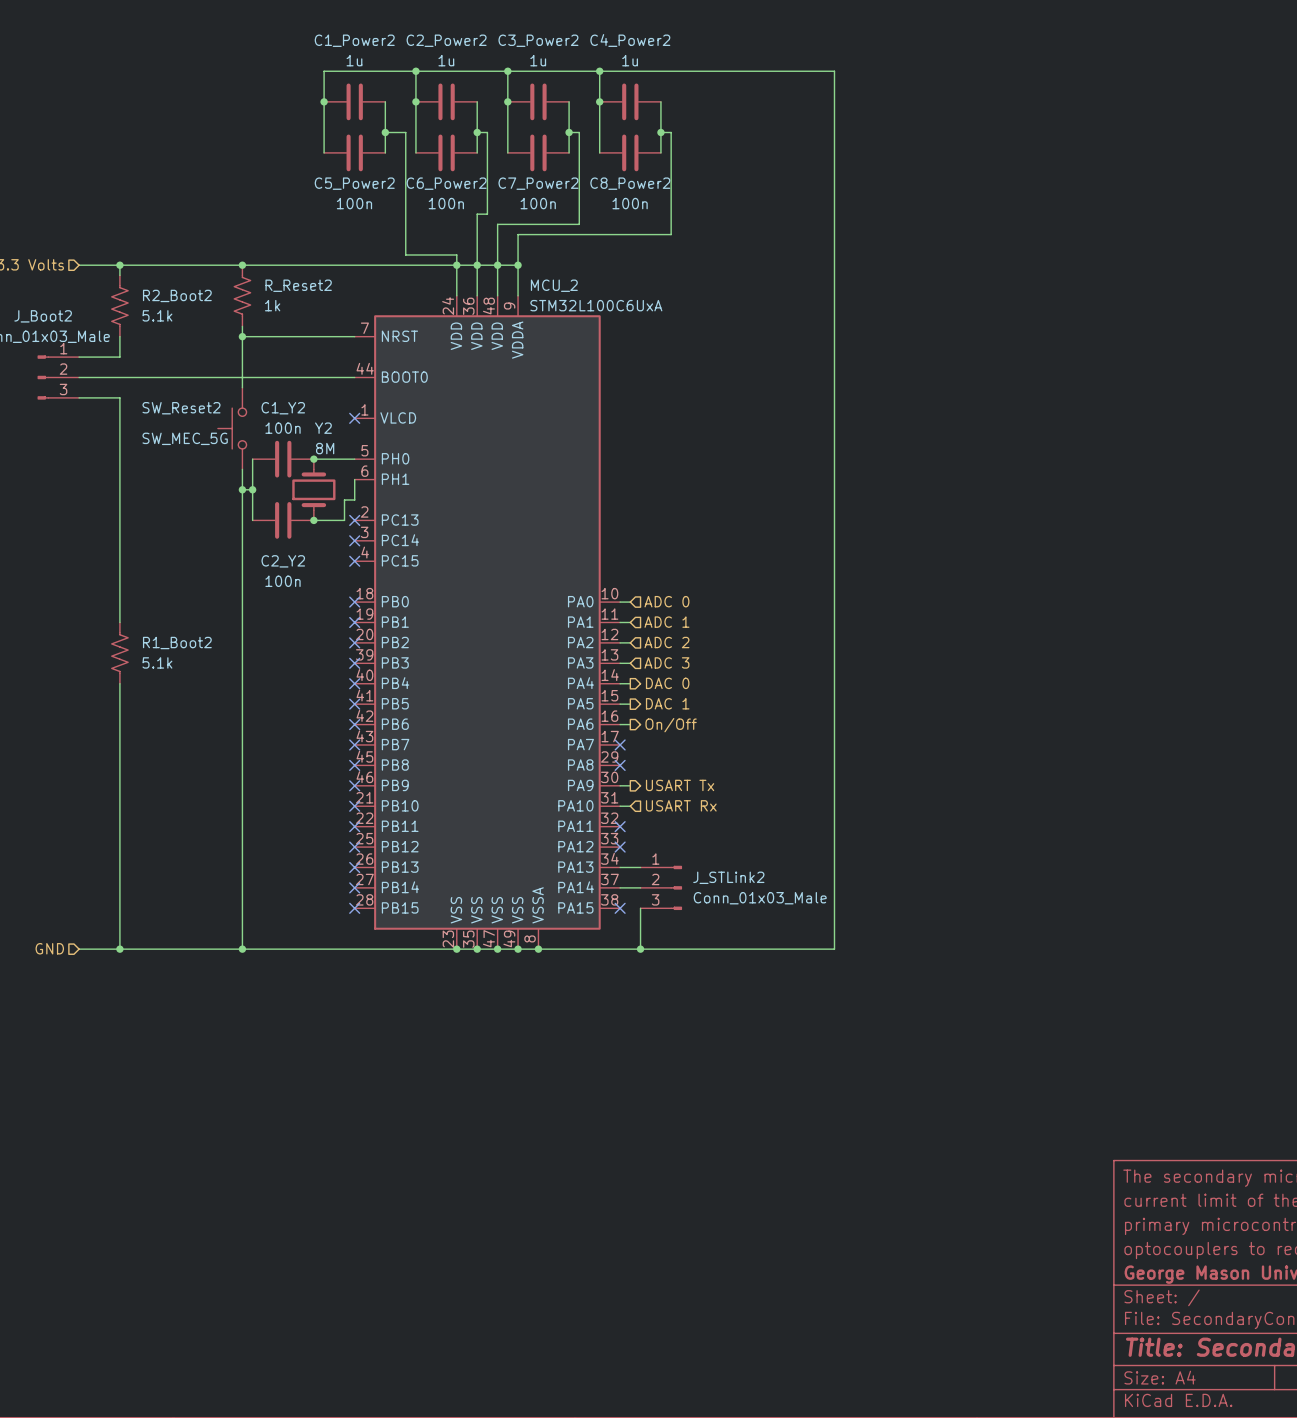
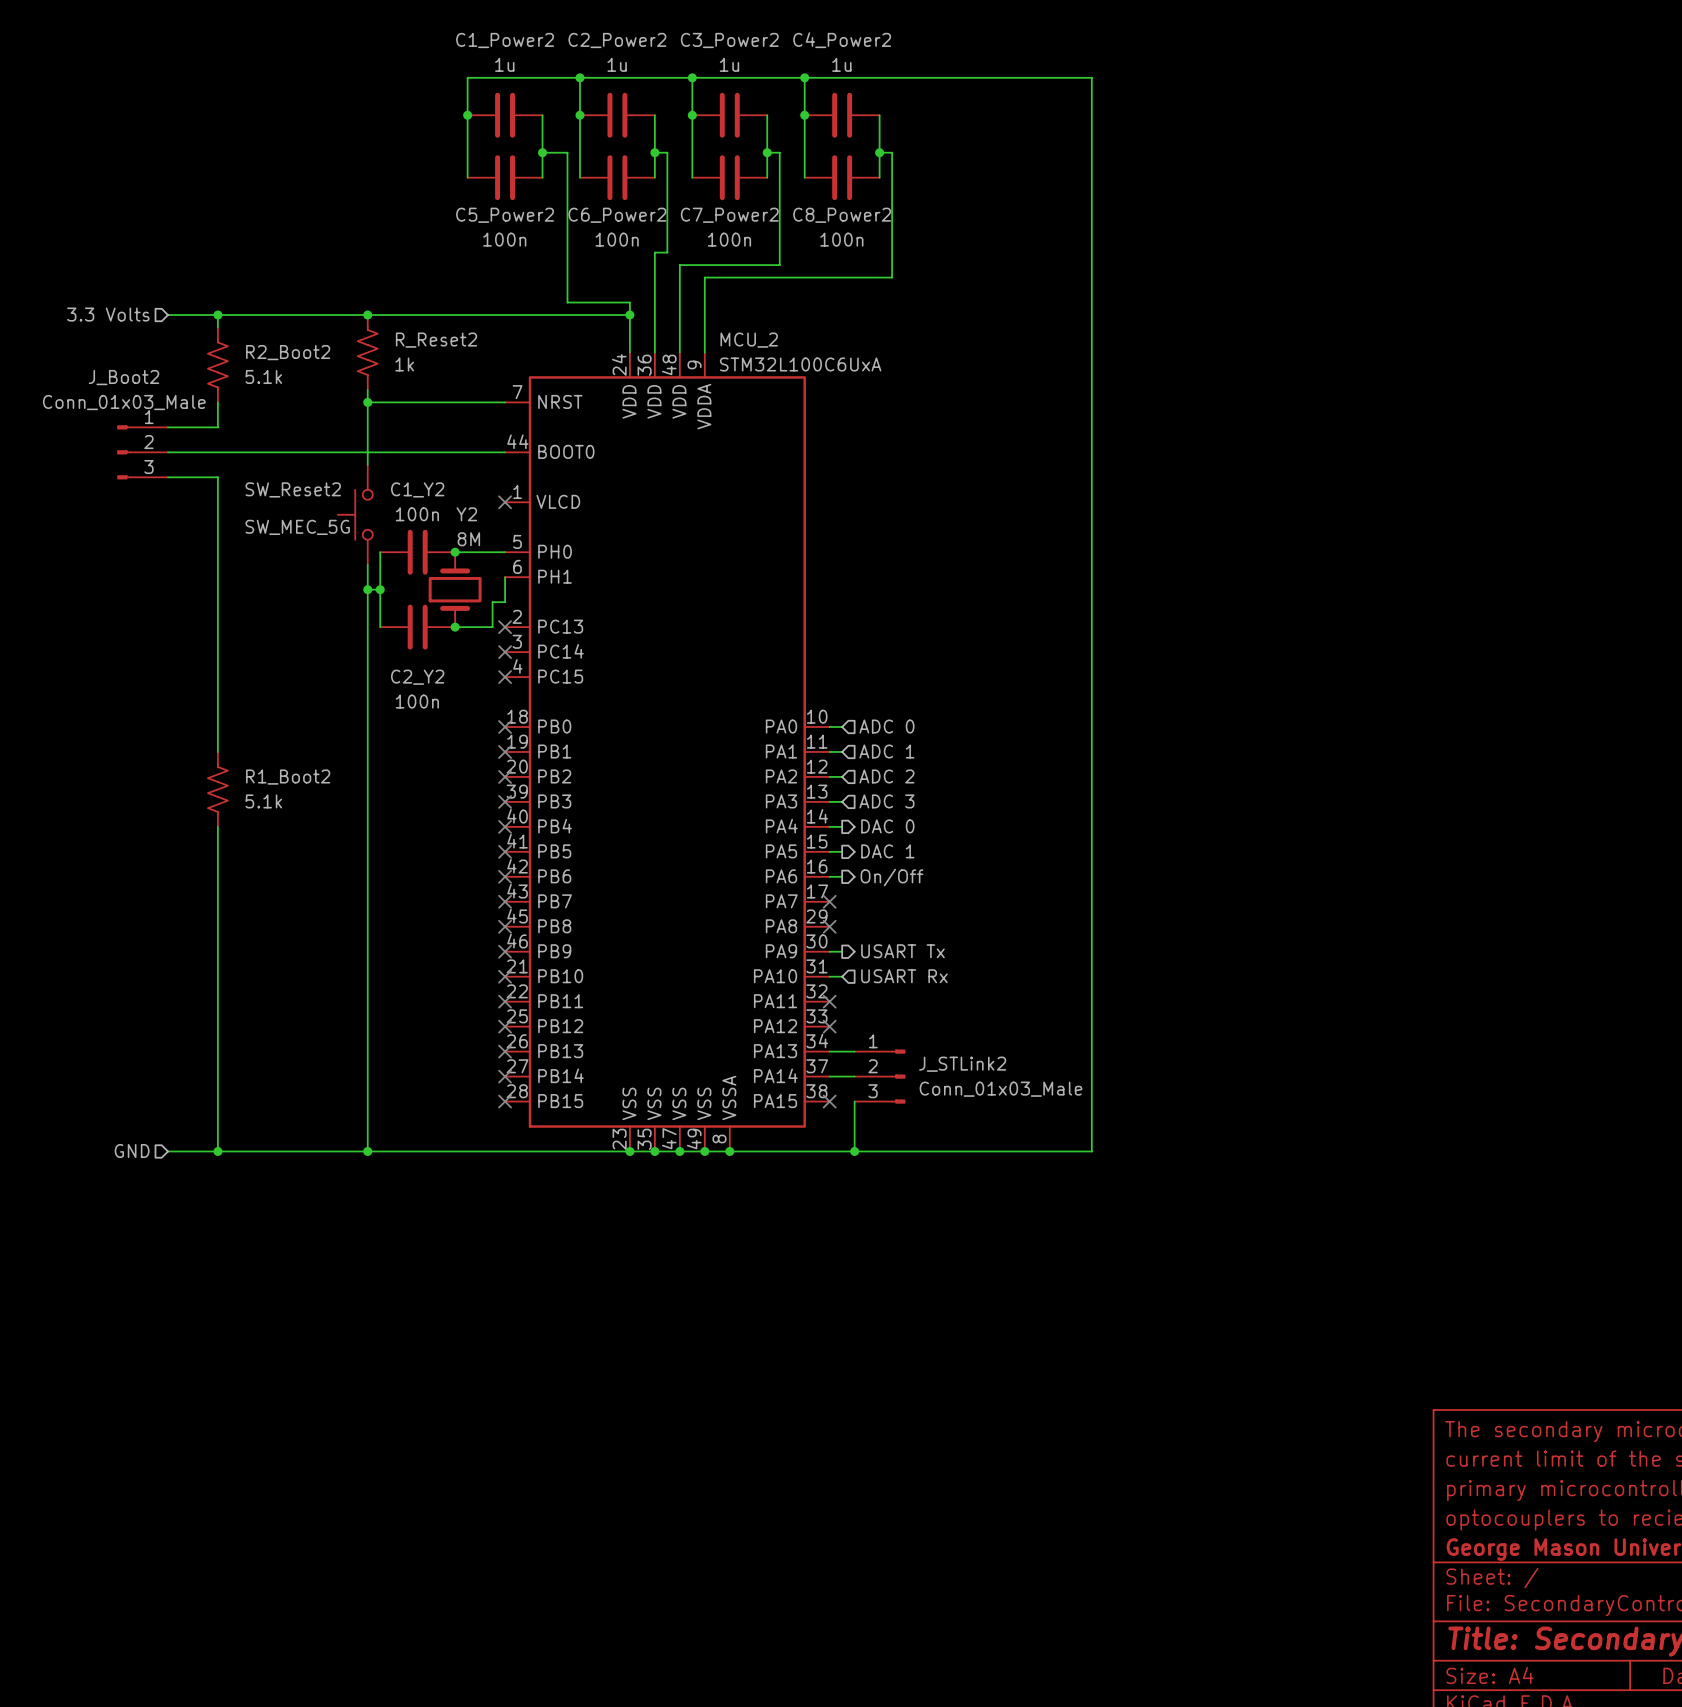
wire: (456, 265) (518, 265) -> none
junction: (477, 265) -> none
junction: (497, 265) -> none
junction: (518, 265) -> none

